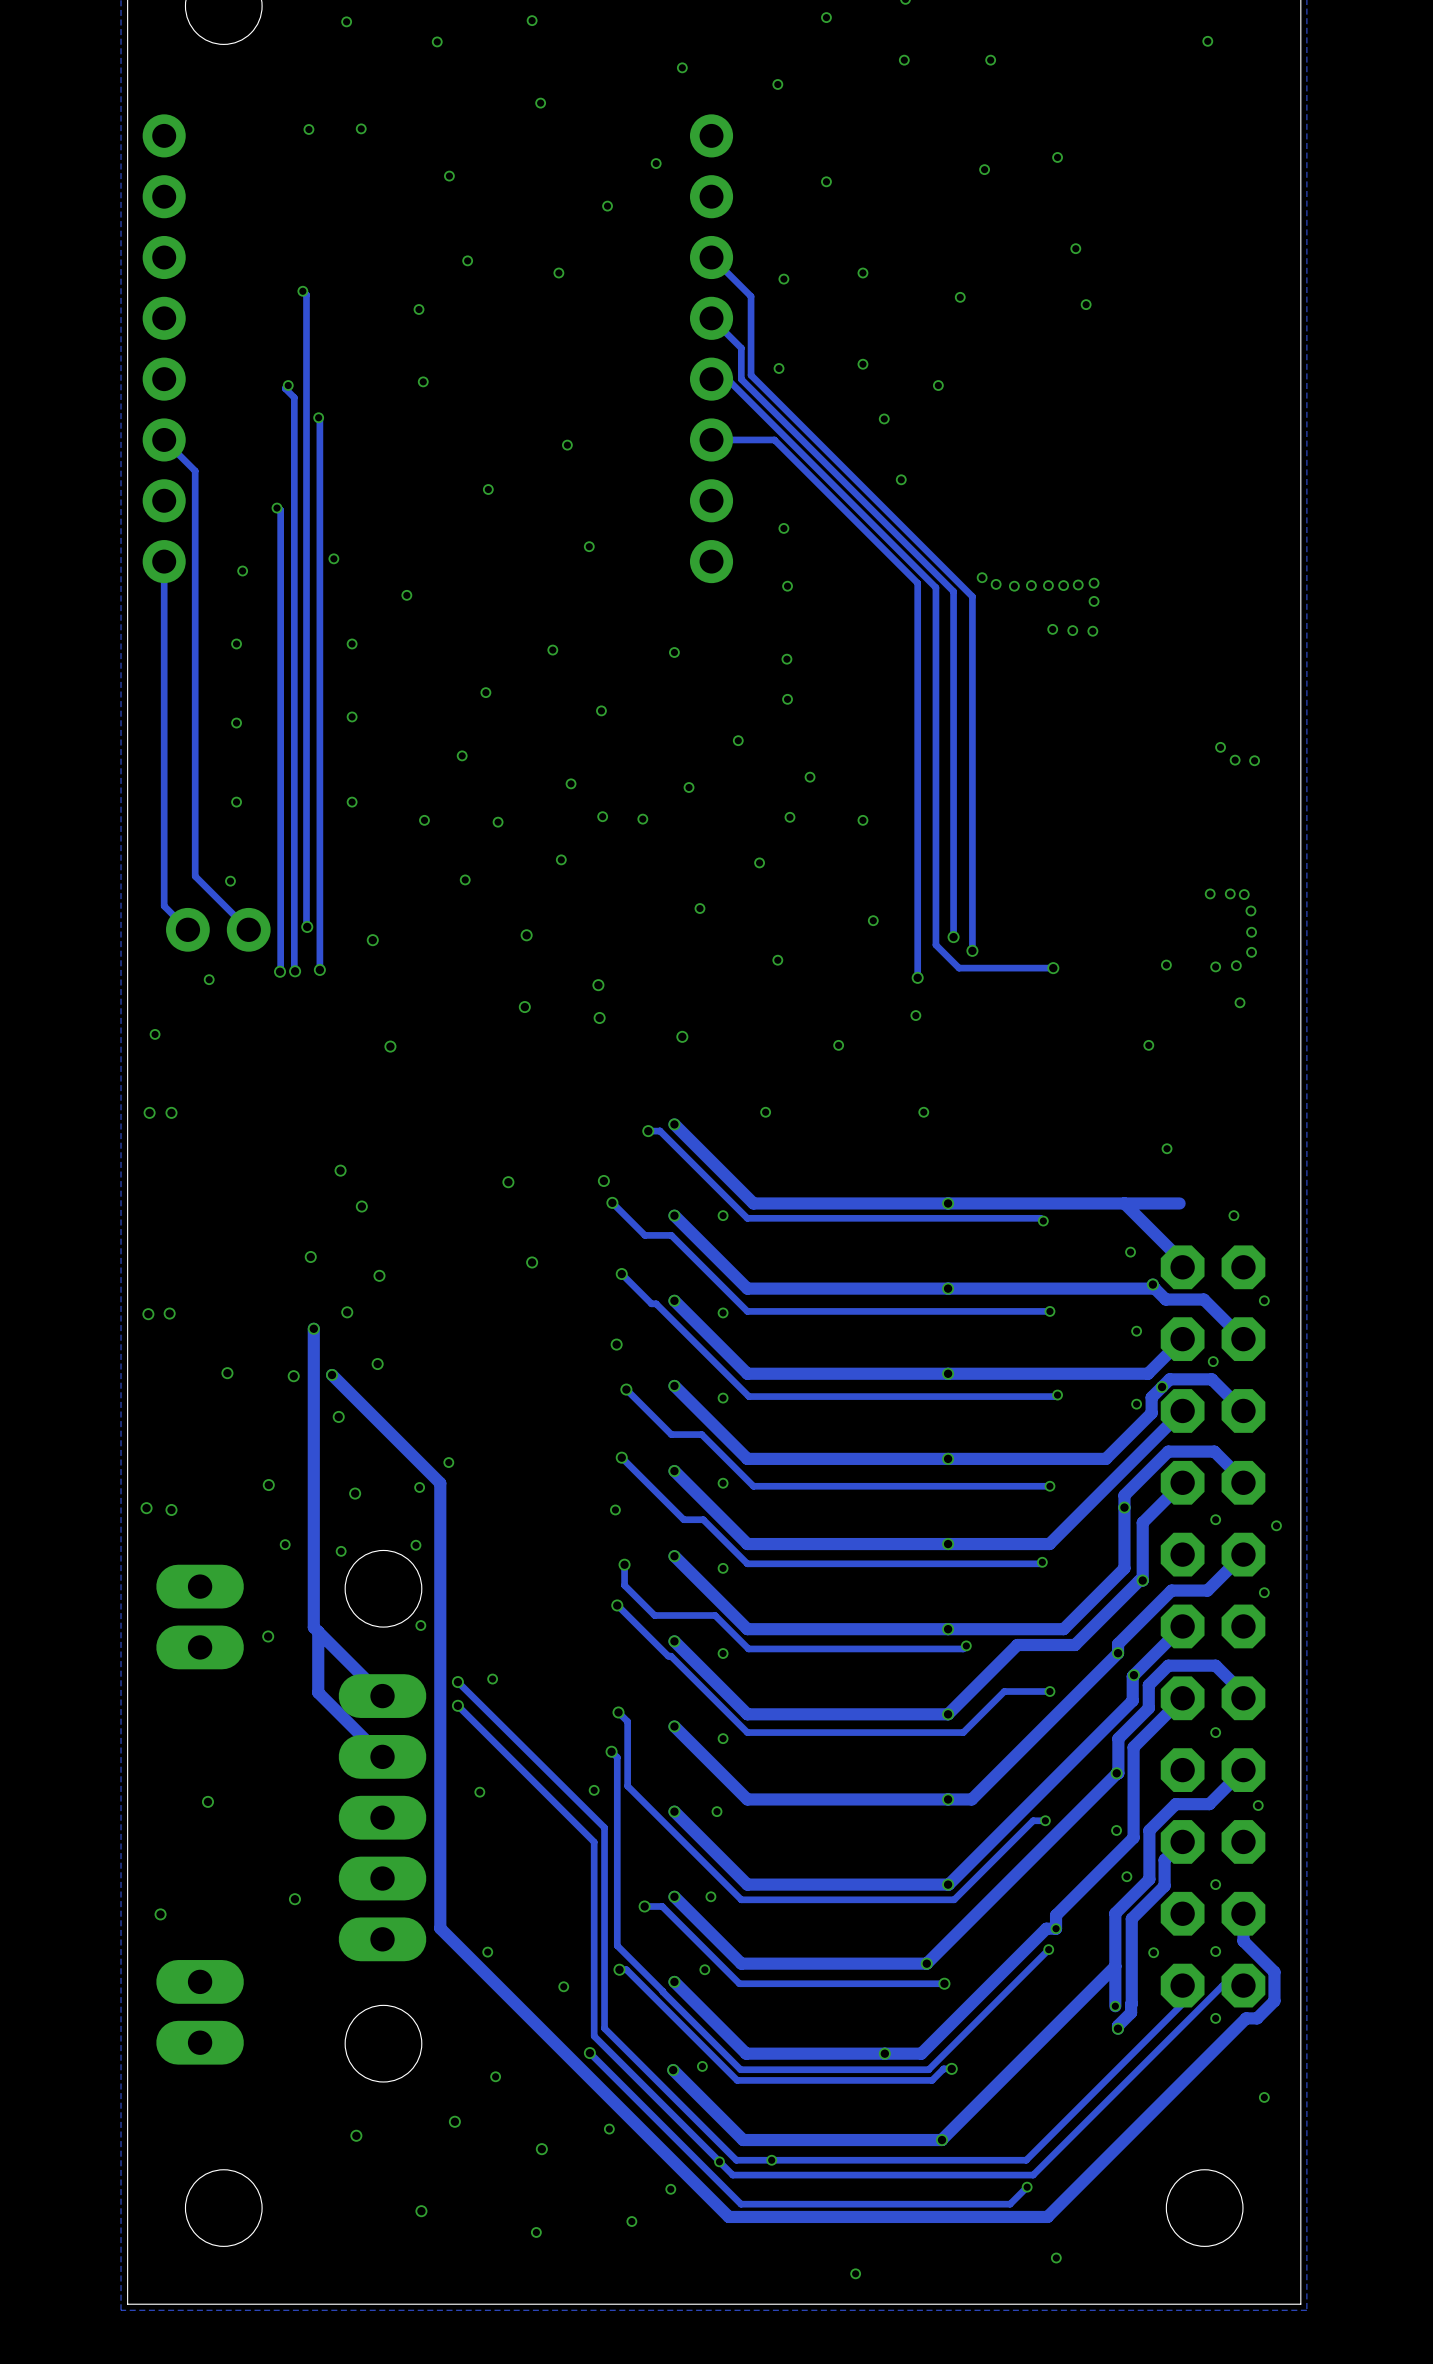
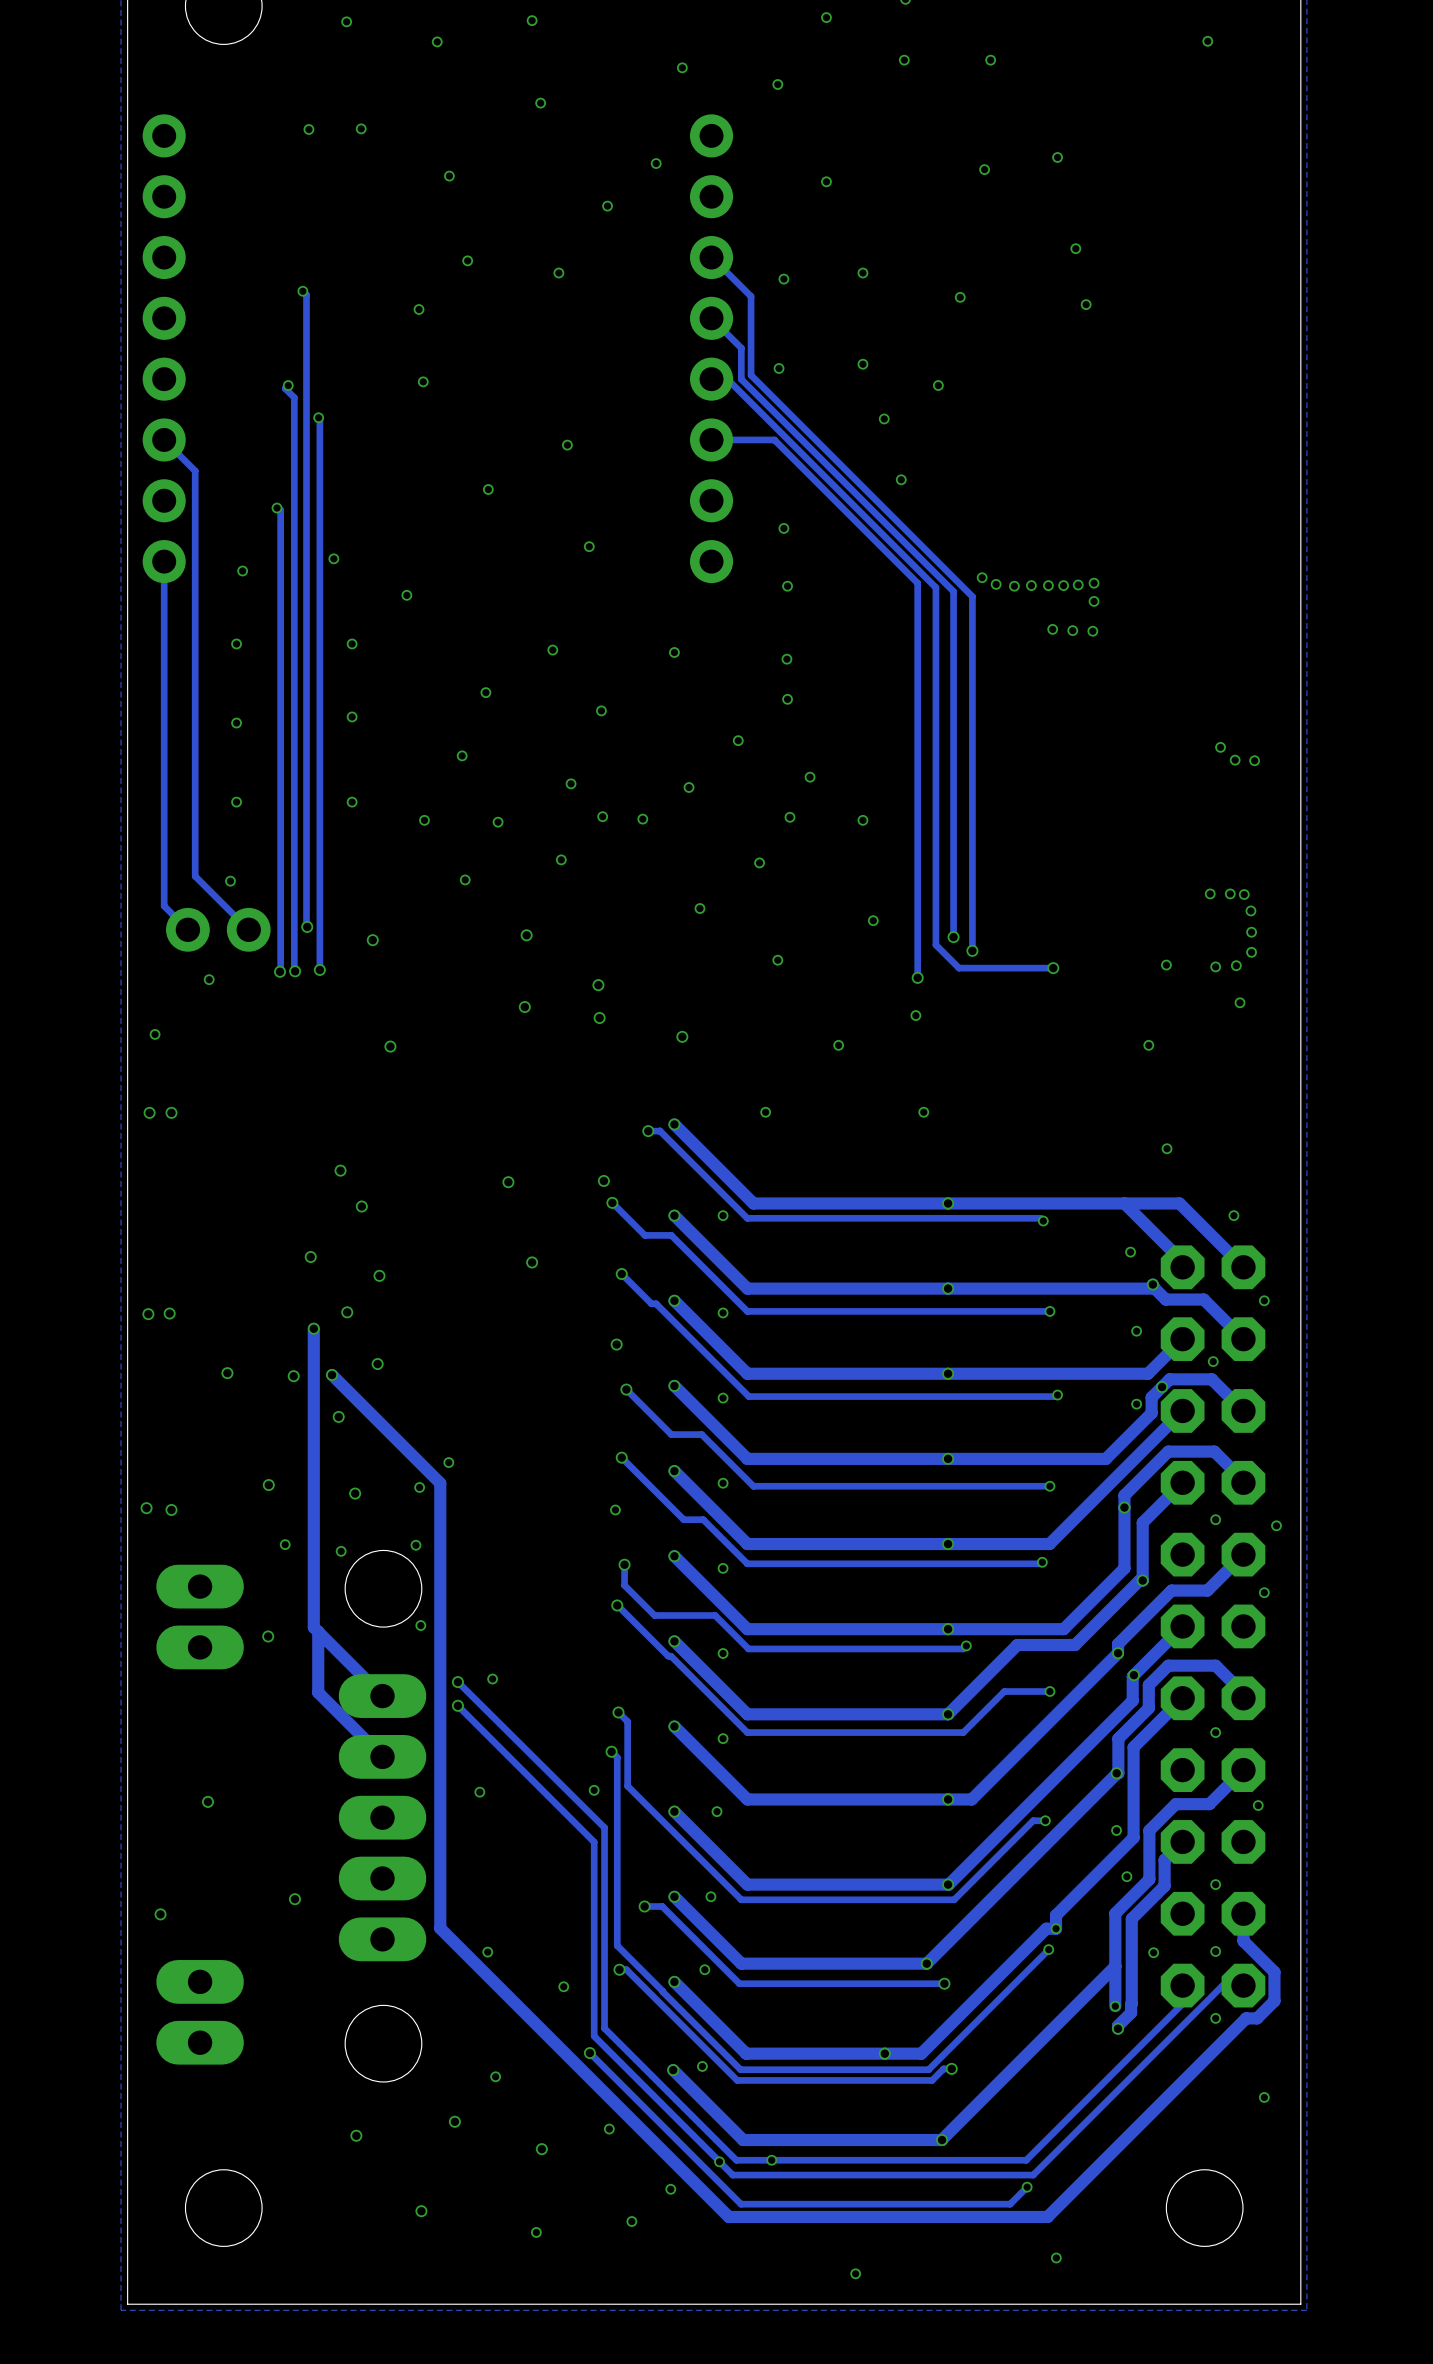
track: none -> (1179, 1203) (1243, 1267)

